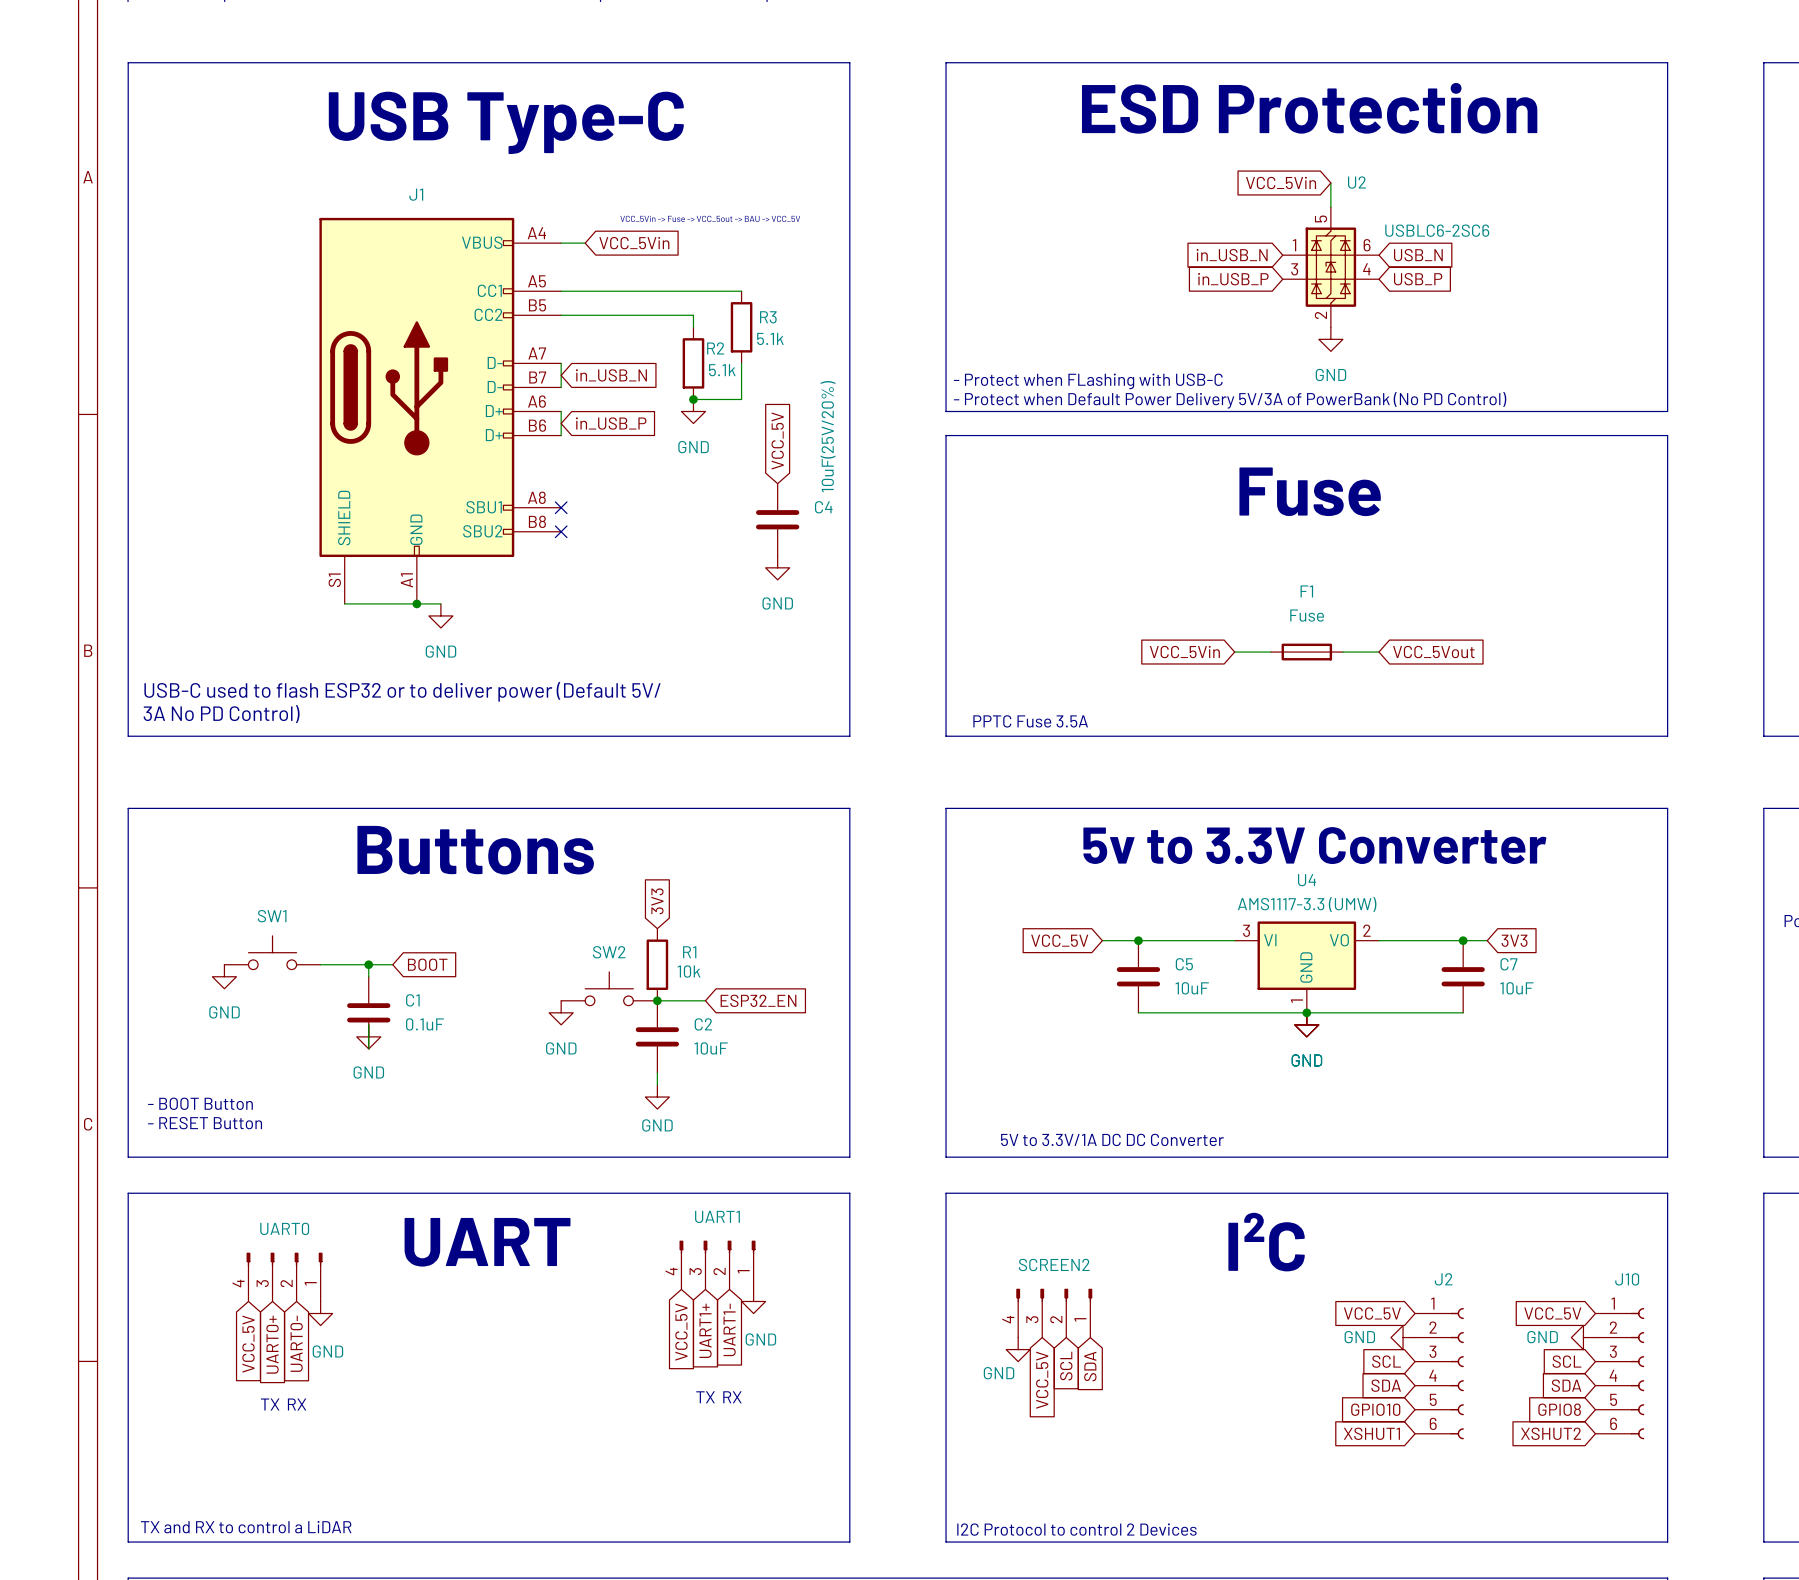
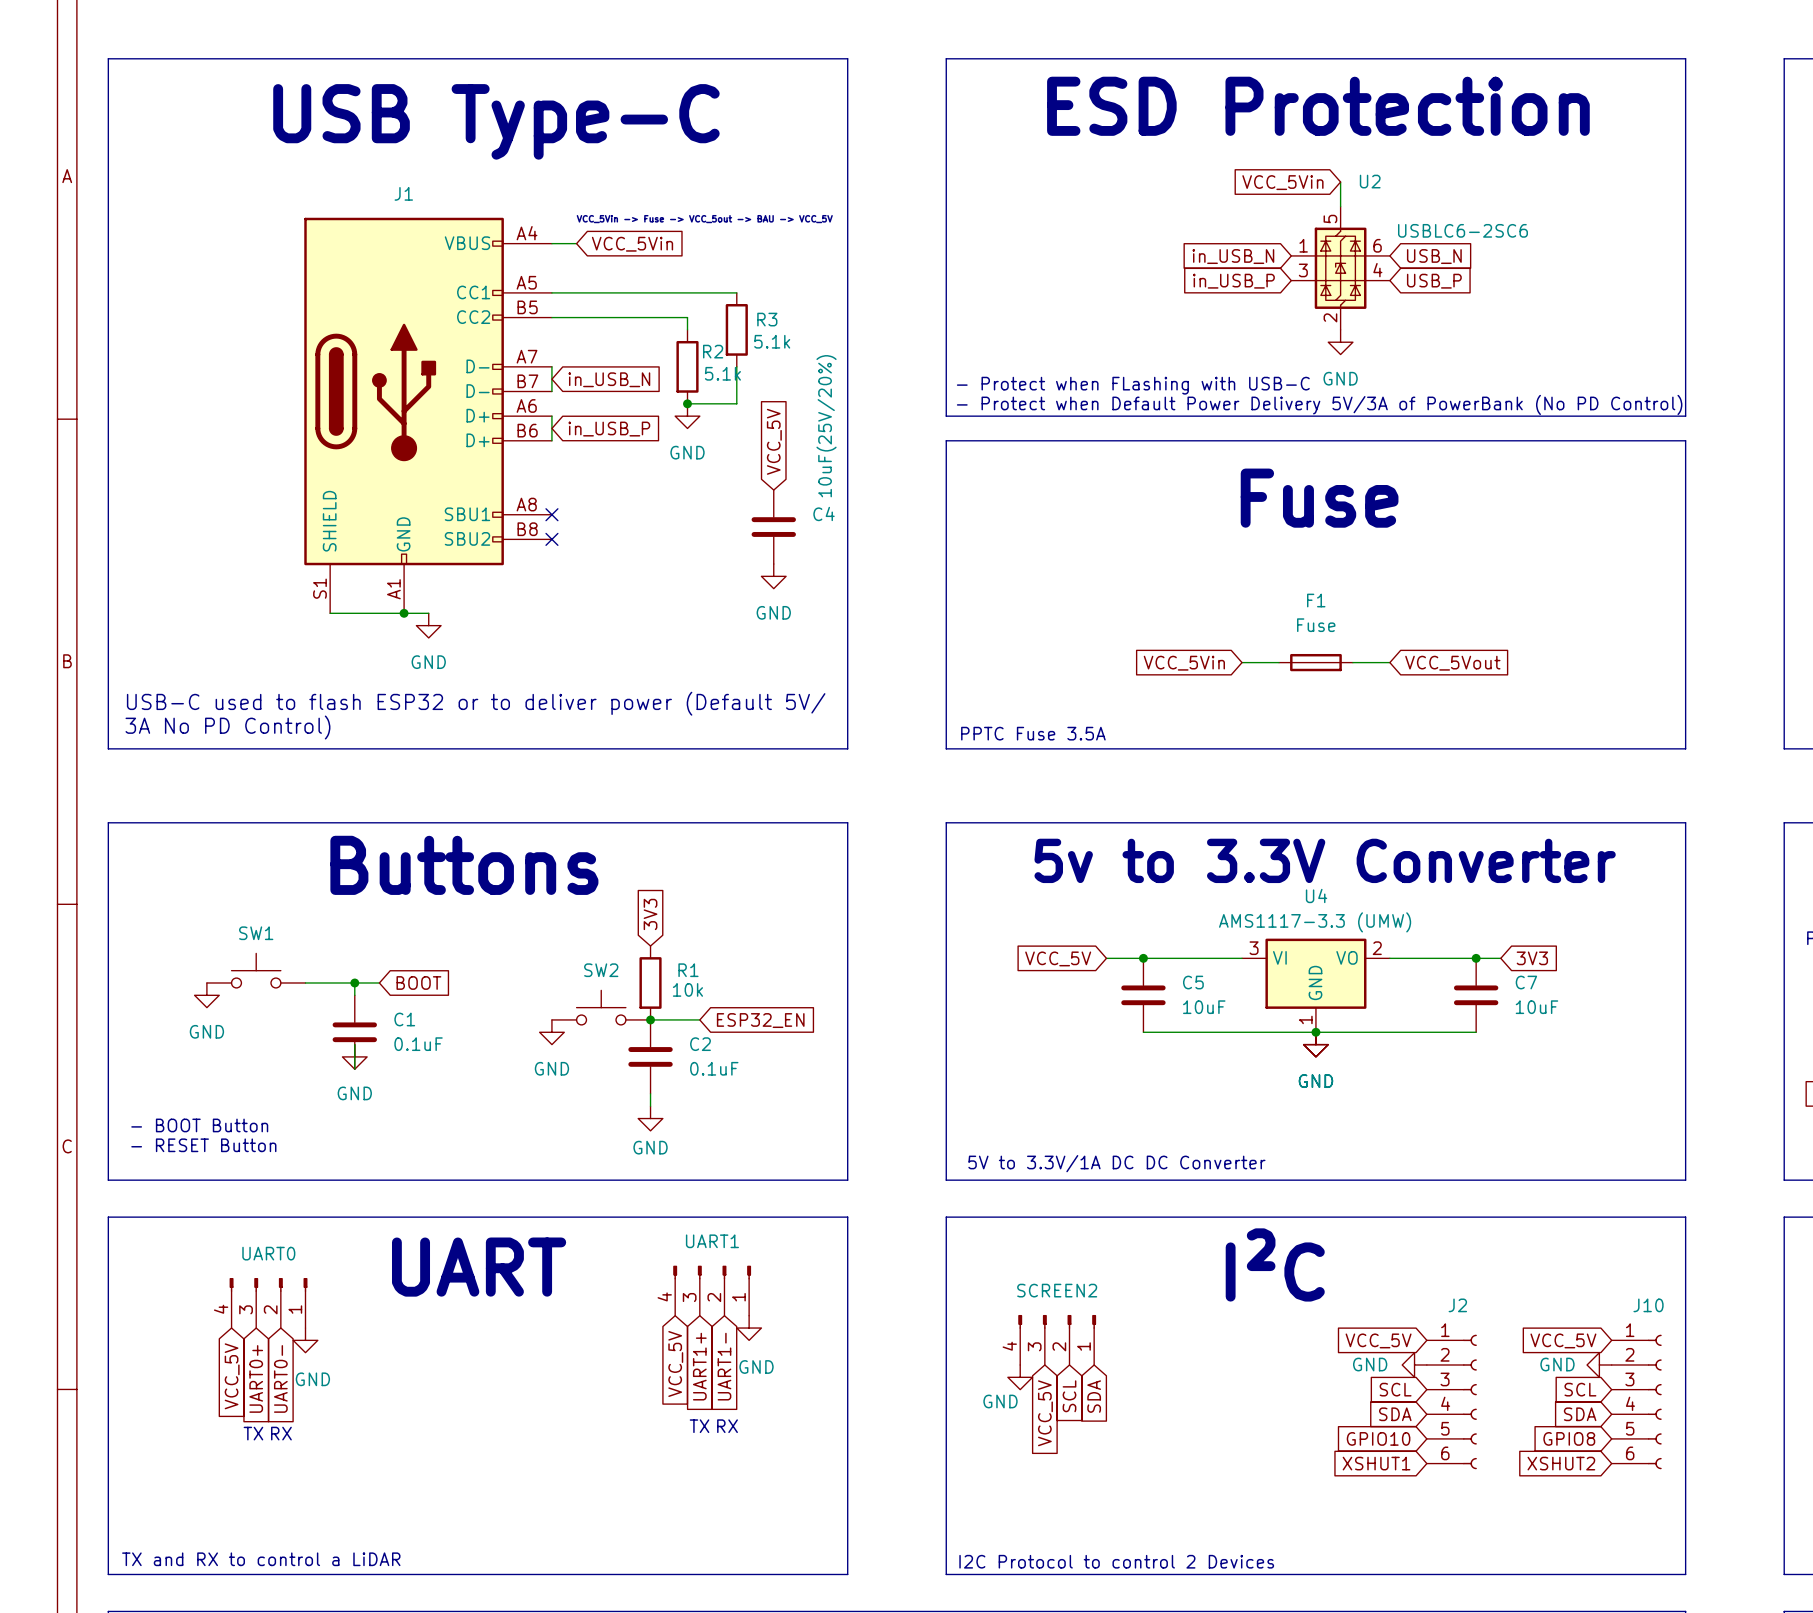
C2 value: 10uF (711, 1048) -> 0.1uF (714, 1068)

